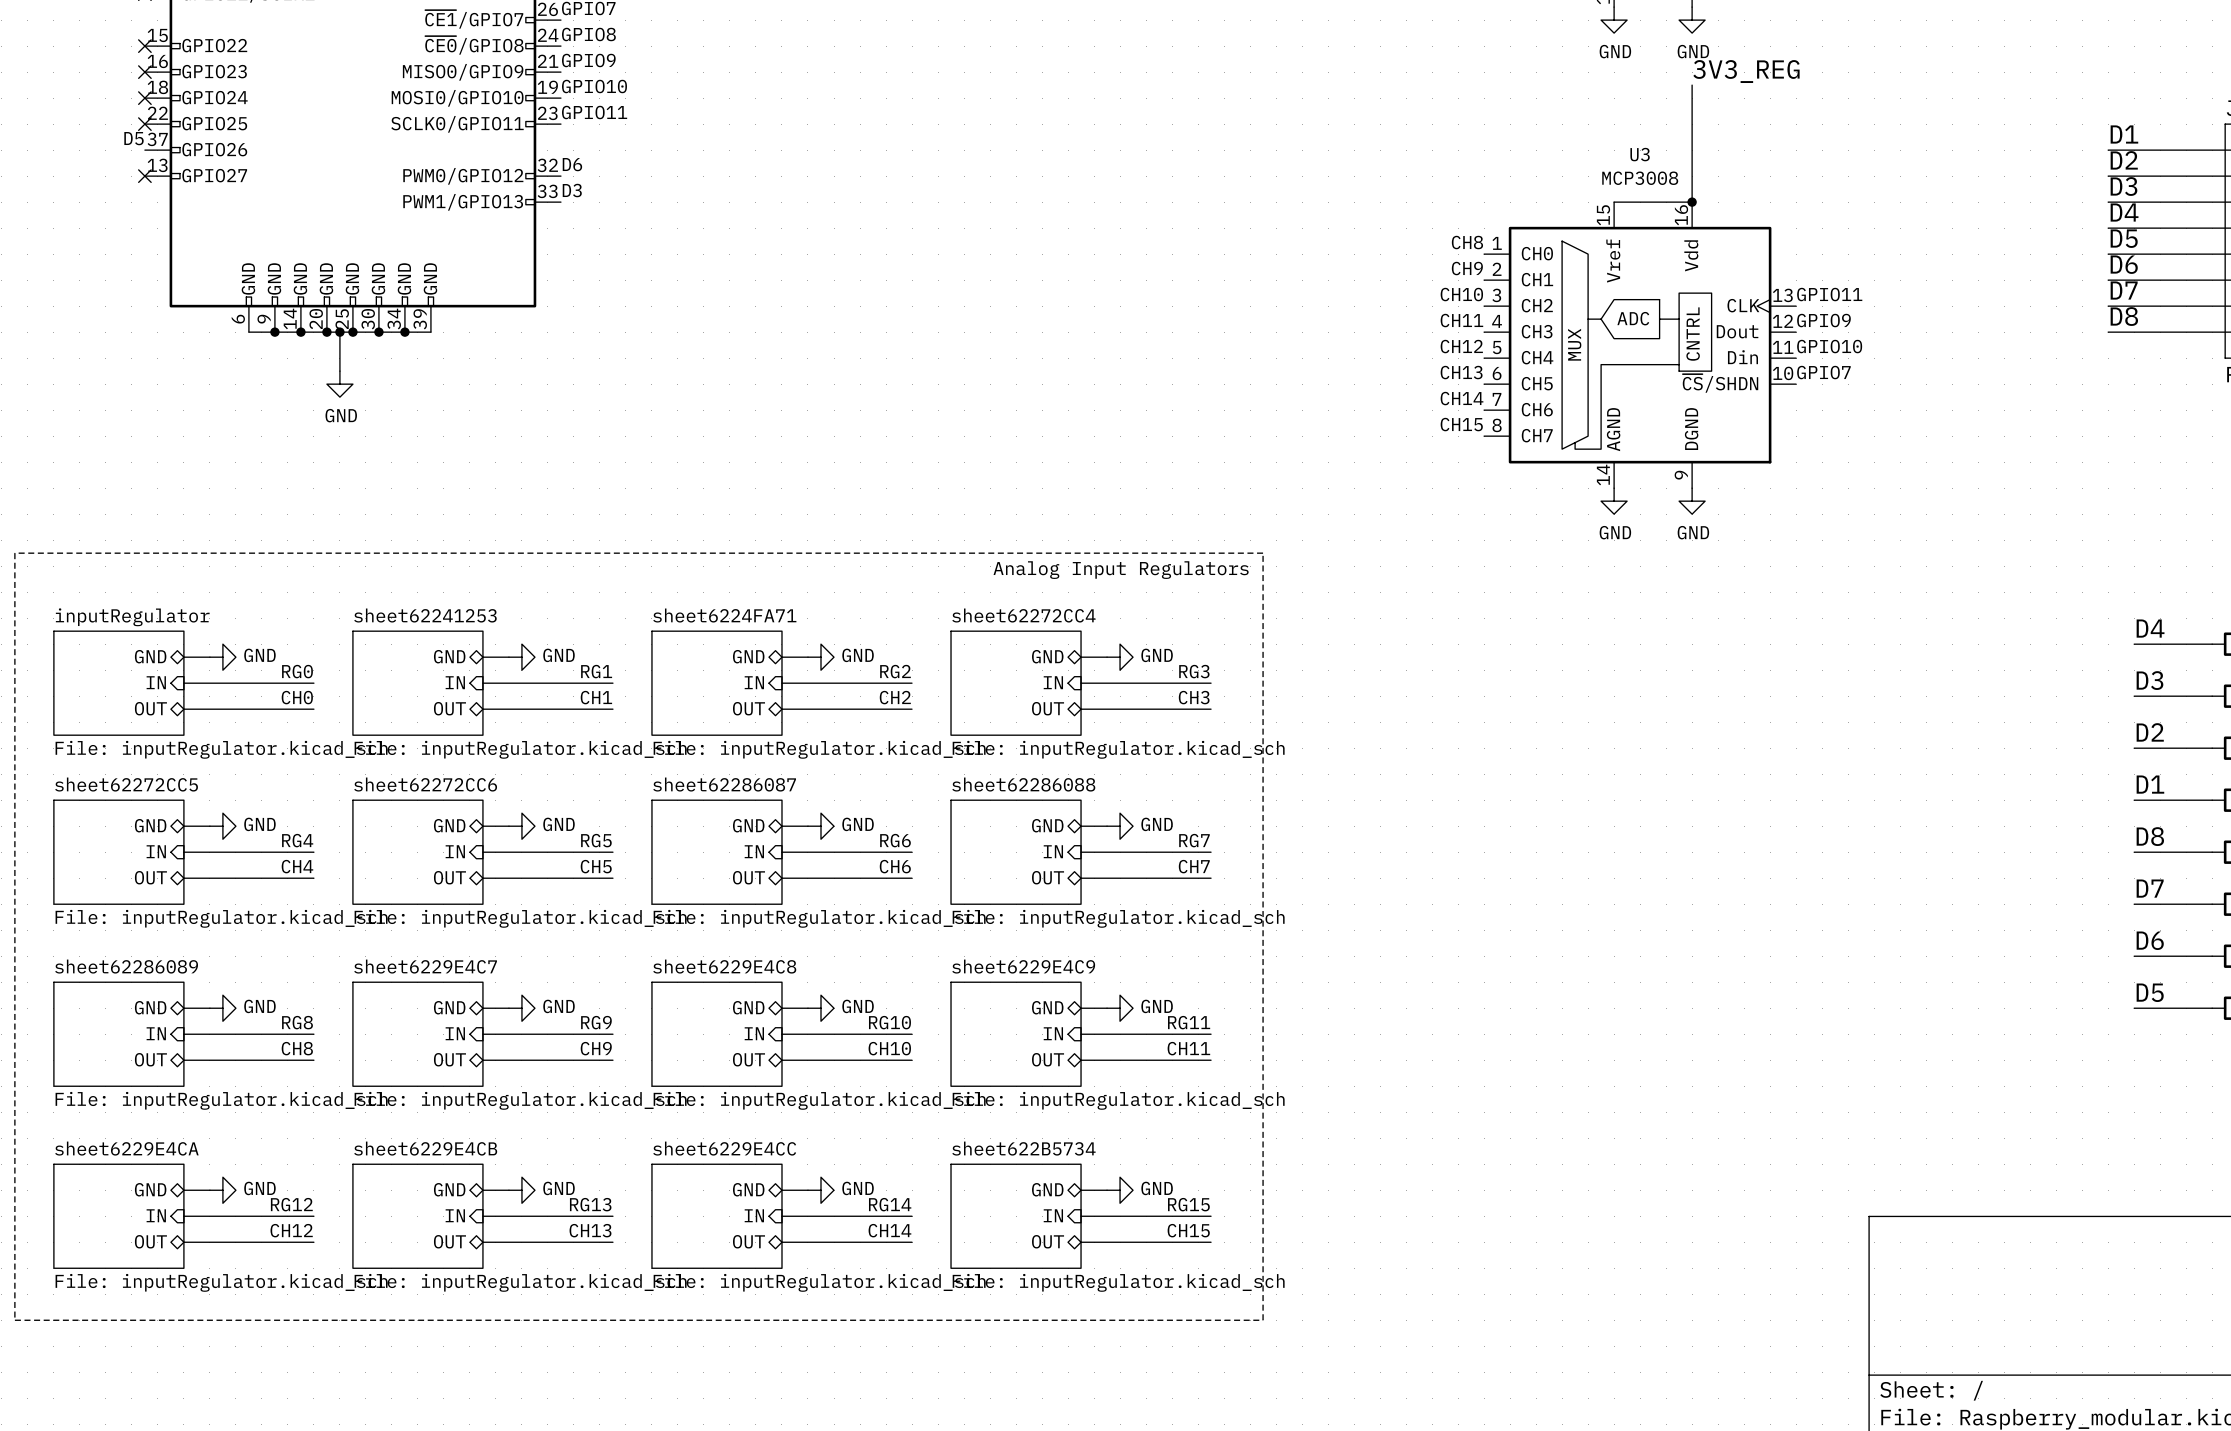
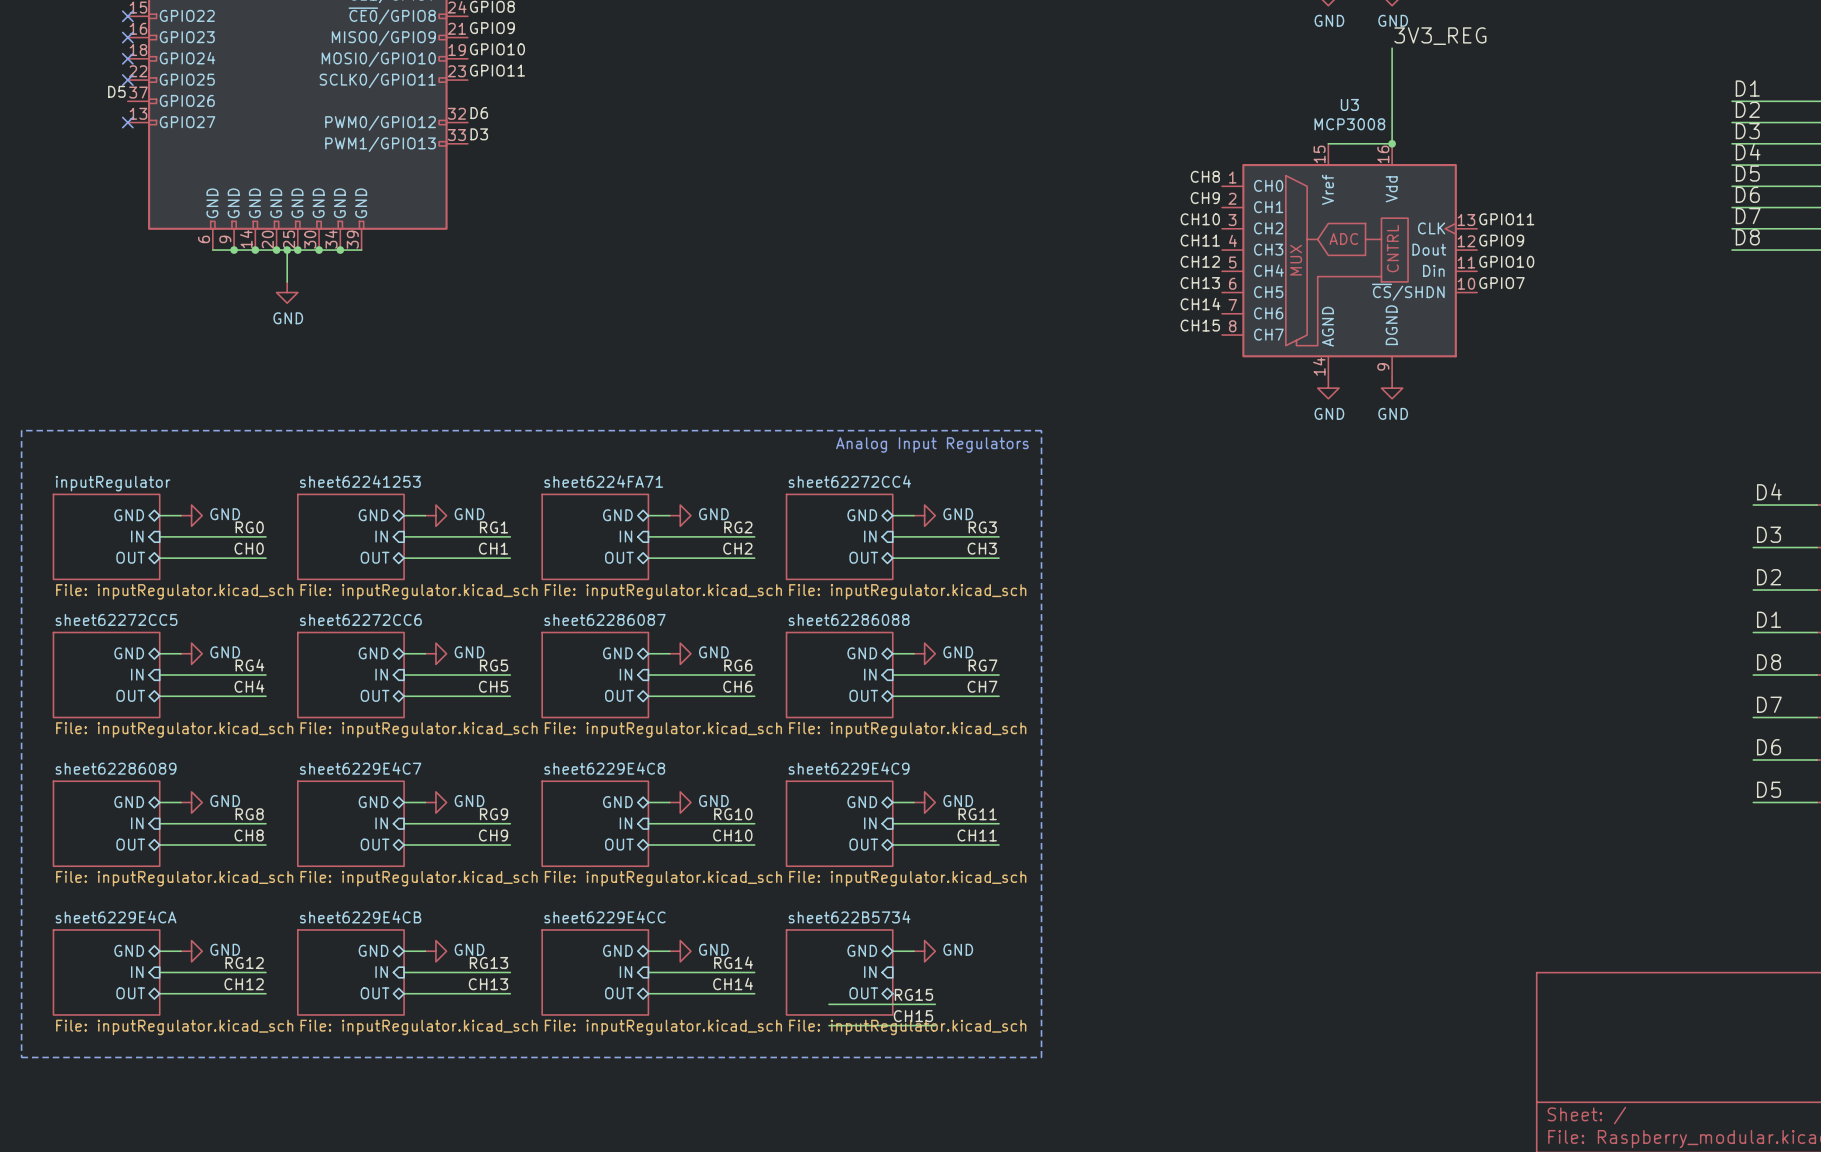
label position: RG15 (1188, 1204) -> RG15 (913, 994)
wire: (1081, 1216) (1211, 1216) -> (829, 1004) (935, 1004)
label position: CH15 (1188, 1230) -> CH15 (913, 1016)
wire: (1081, 1242) (1211, 1242) -> (829, 1025) (935, 1025)

